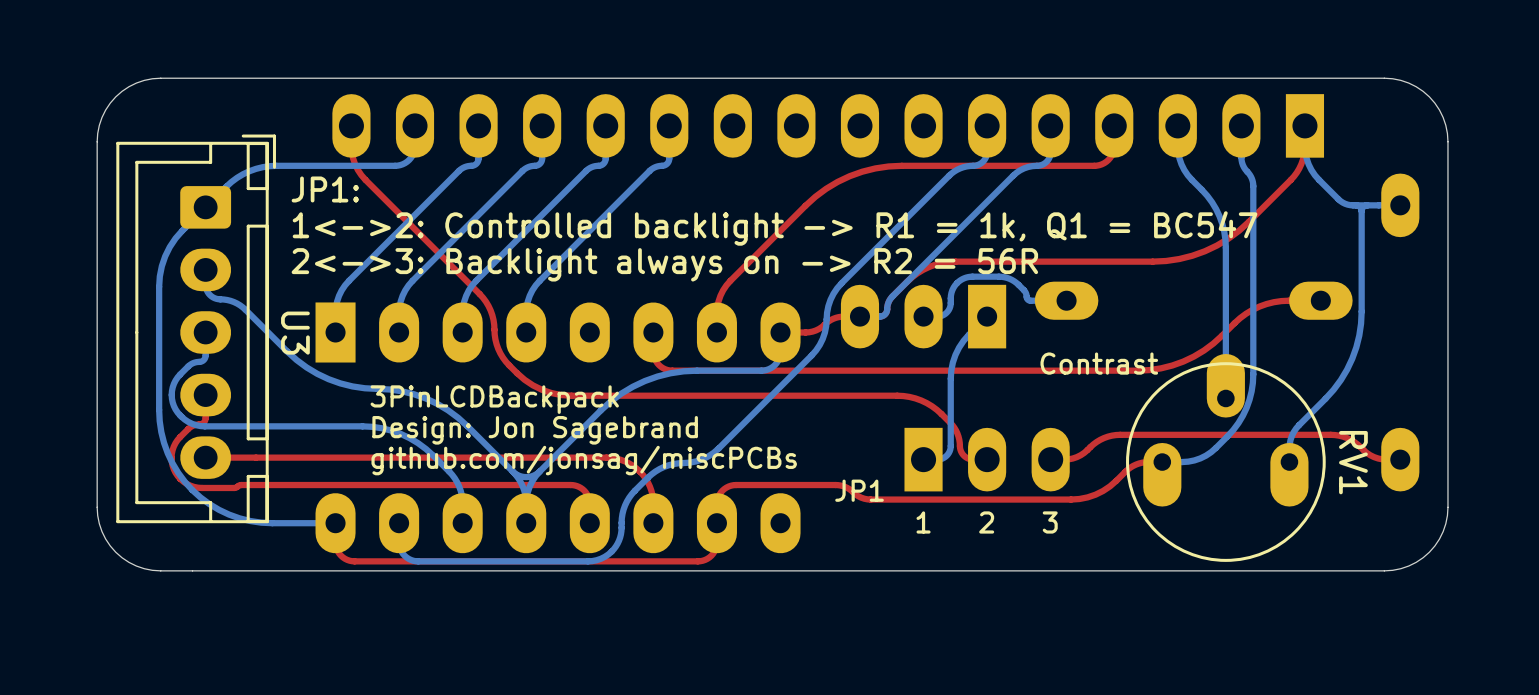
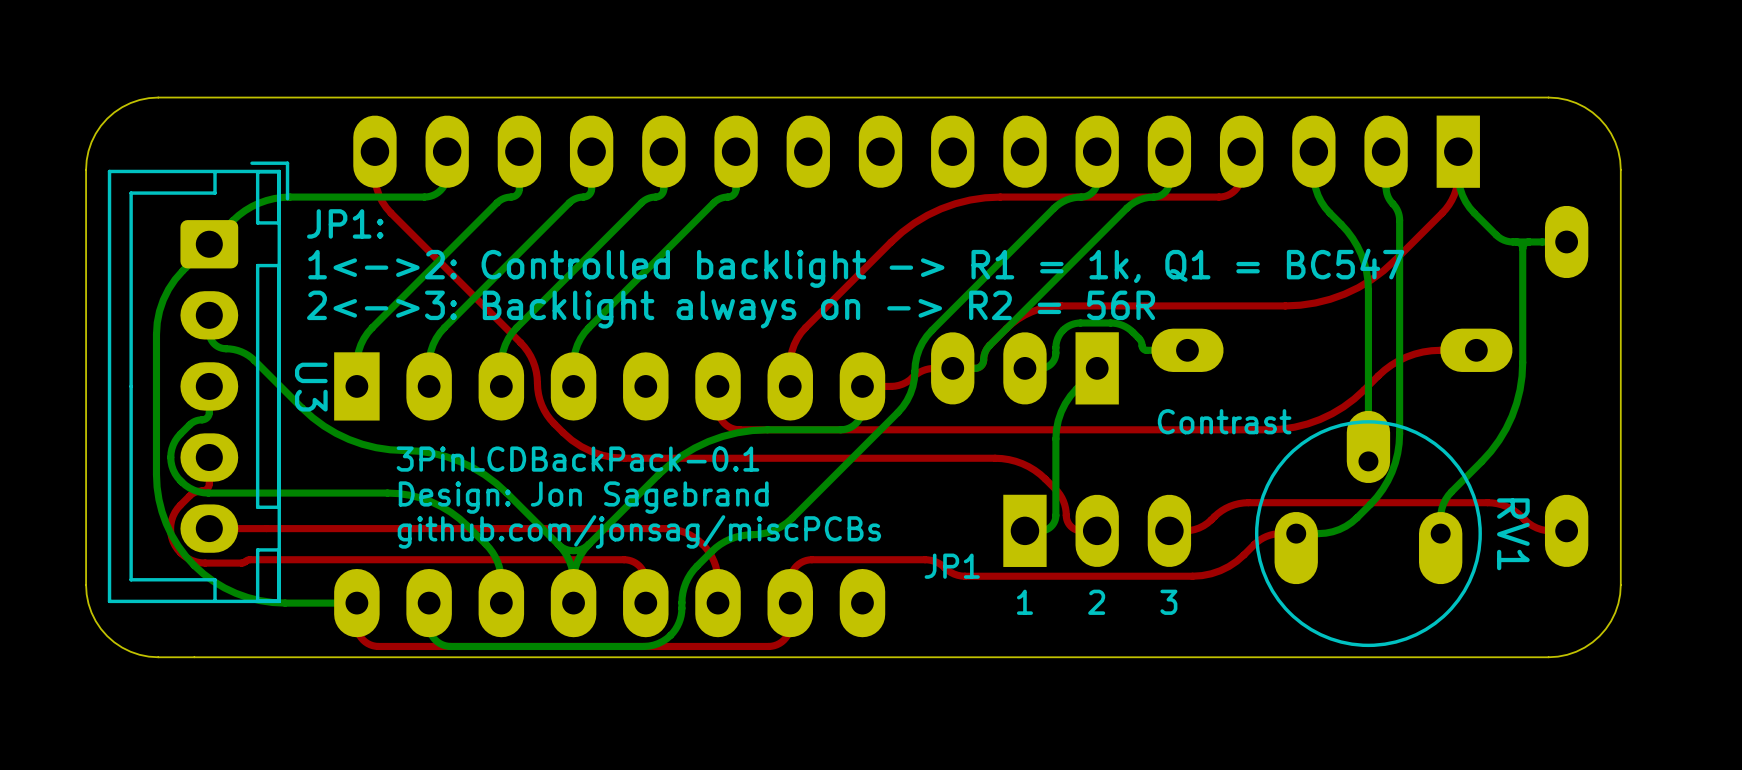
text: 3PinLCDBackpack (494, 399) -> 3PinLCDBackPack-0.1 (578, 459)

